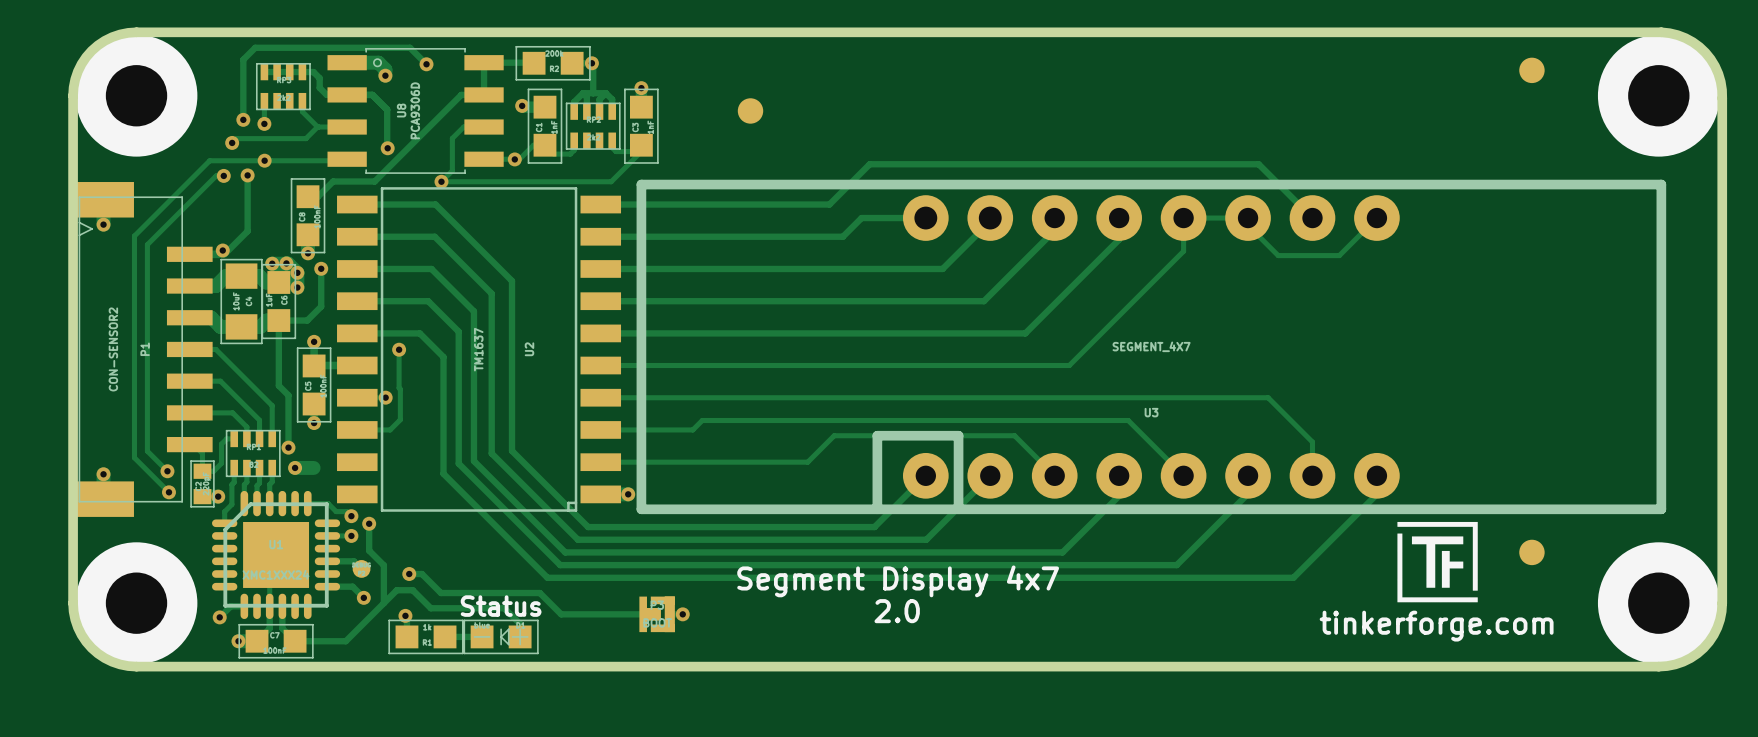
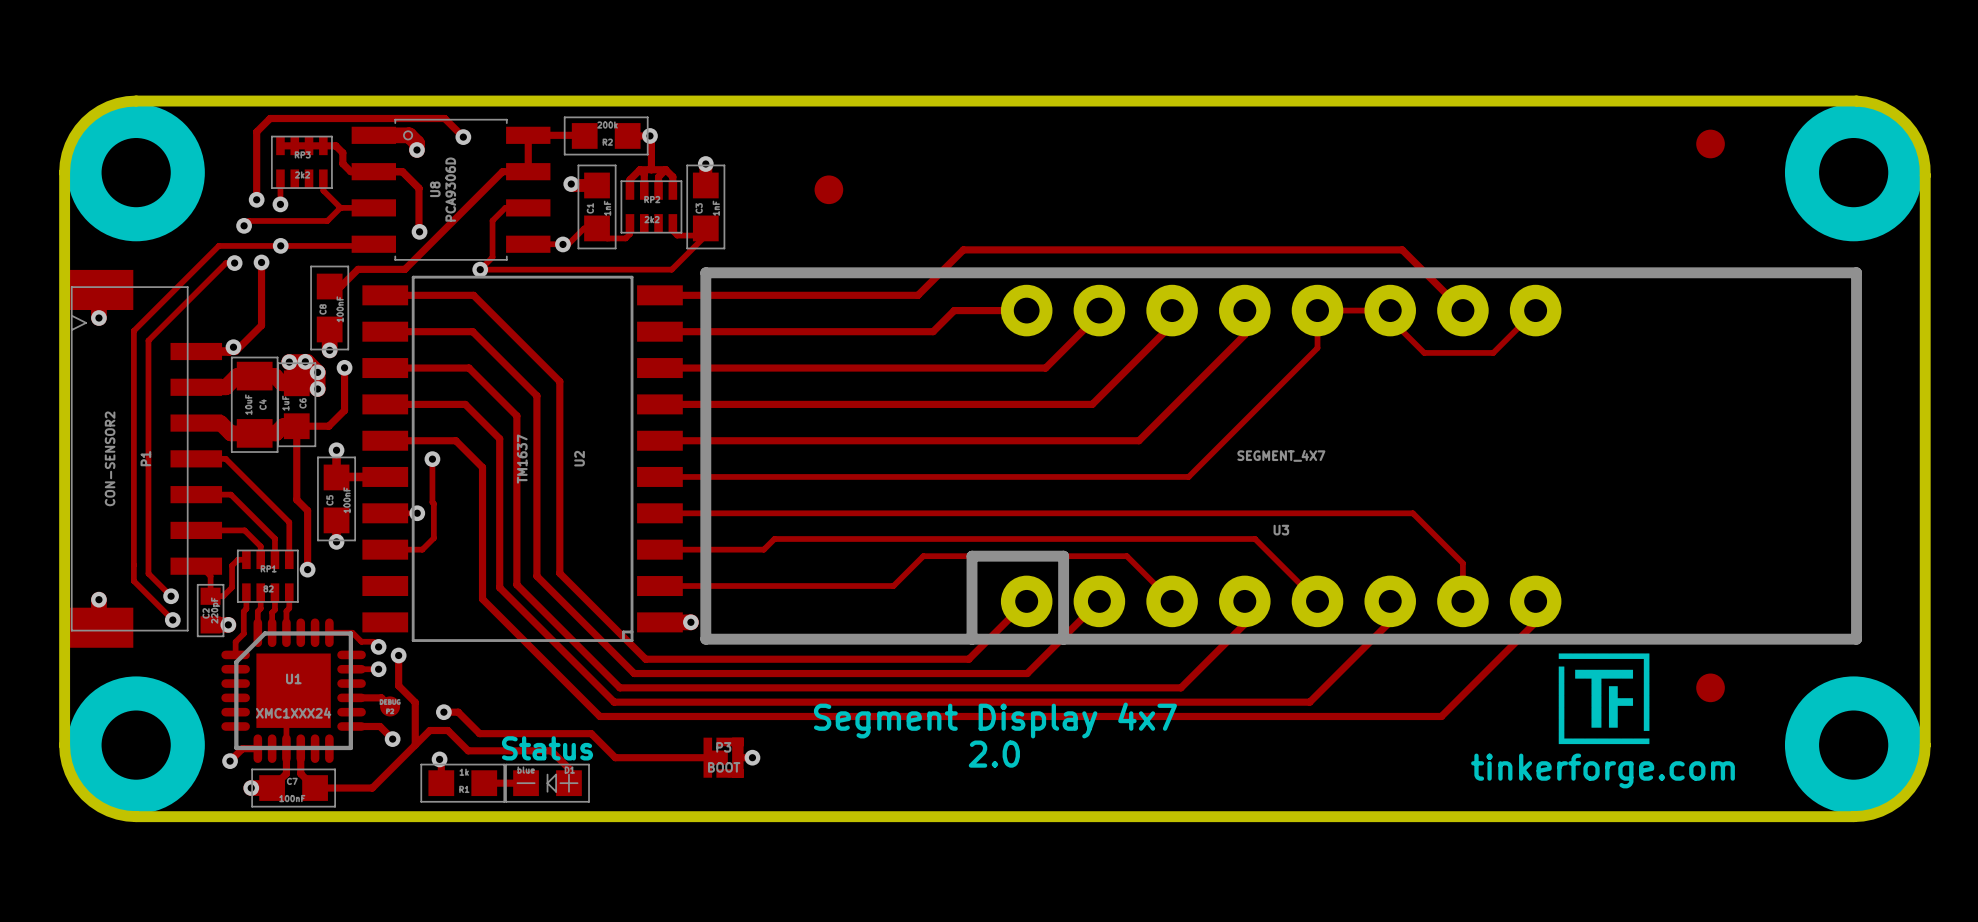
track: (295, 467) (313, 467) -> none
via: (295, 467) -> none

